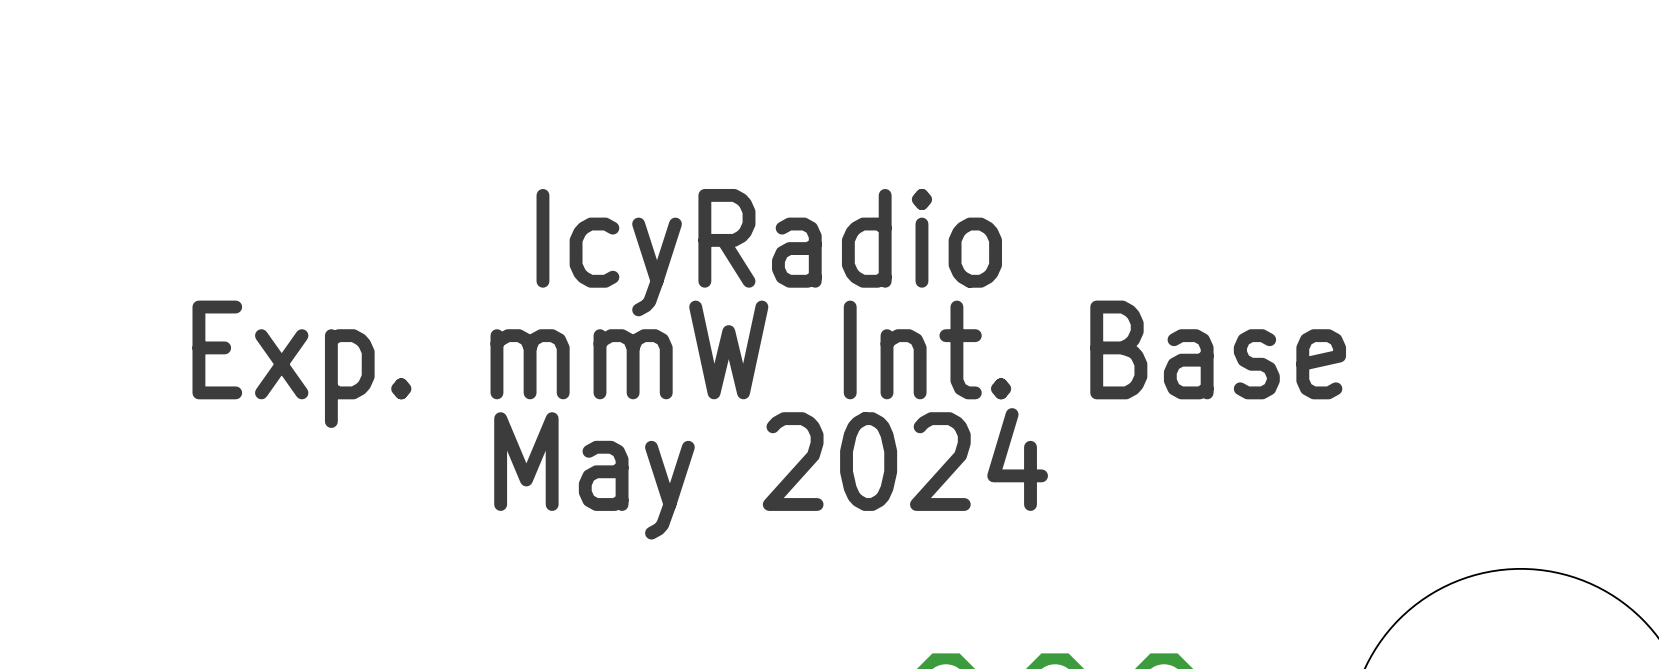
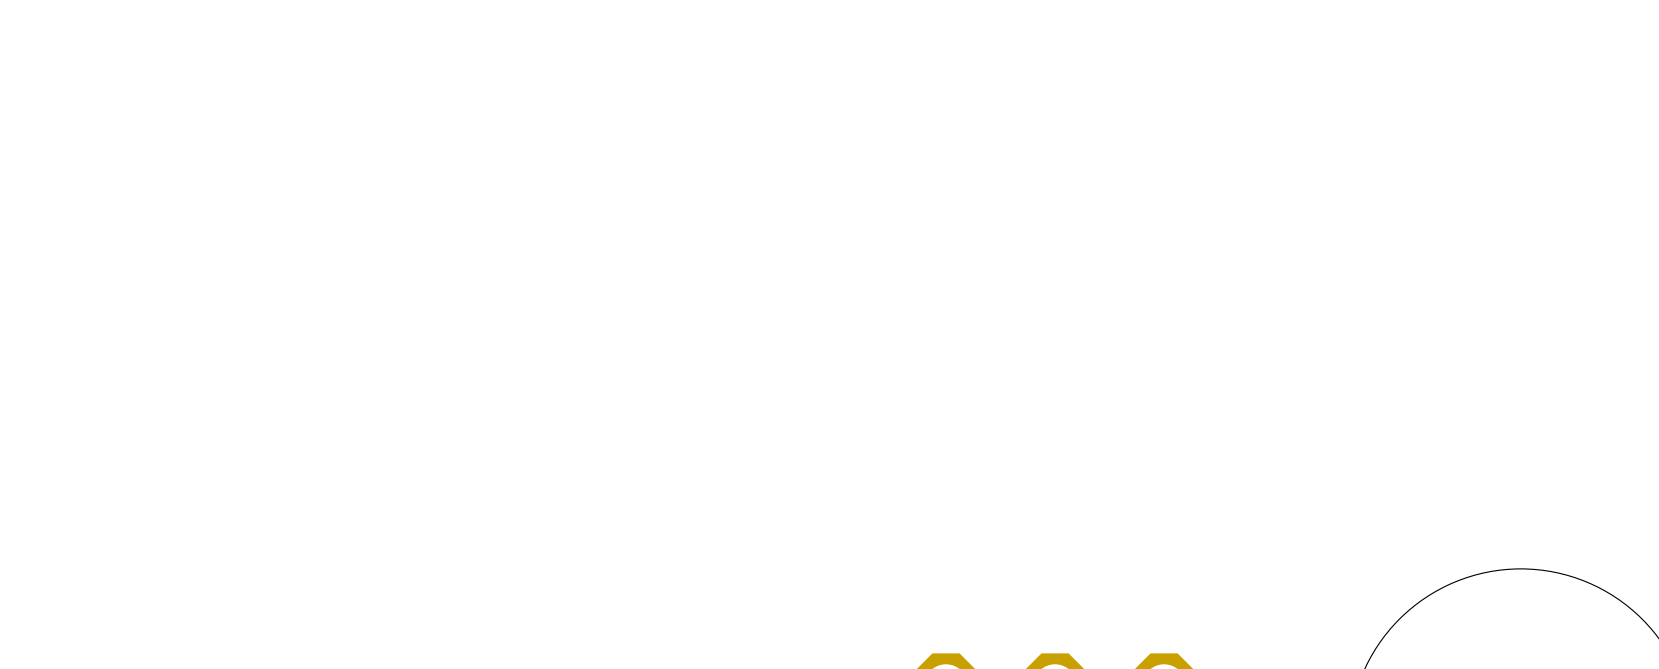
text: IcyRadio (769, 252) -> none
text: Exp. mmW Int. Base (769, 364) -> none
text: May 2024 (771, 473) -> none

